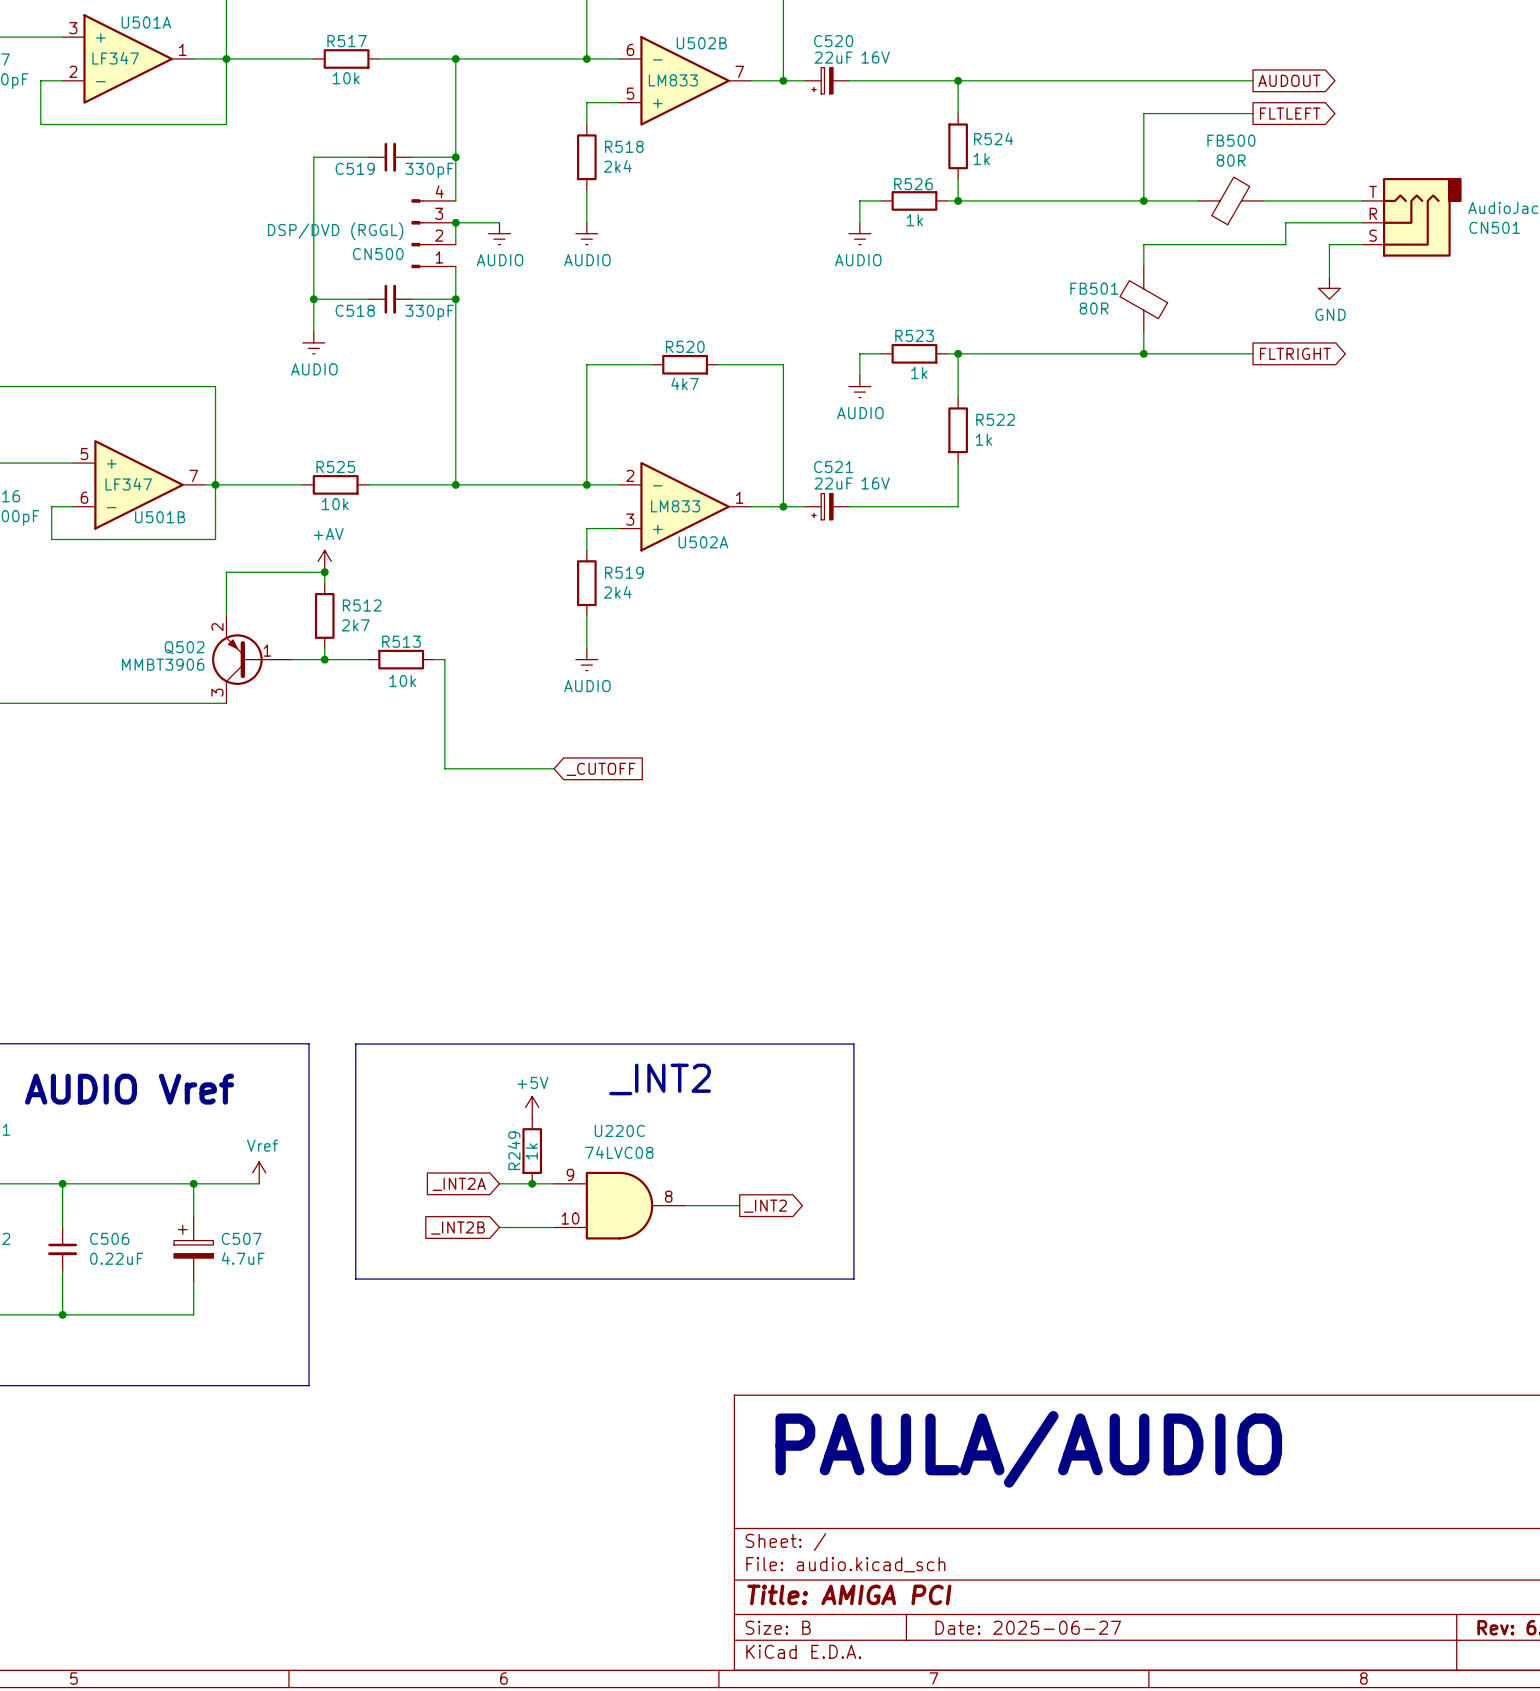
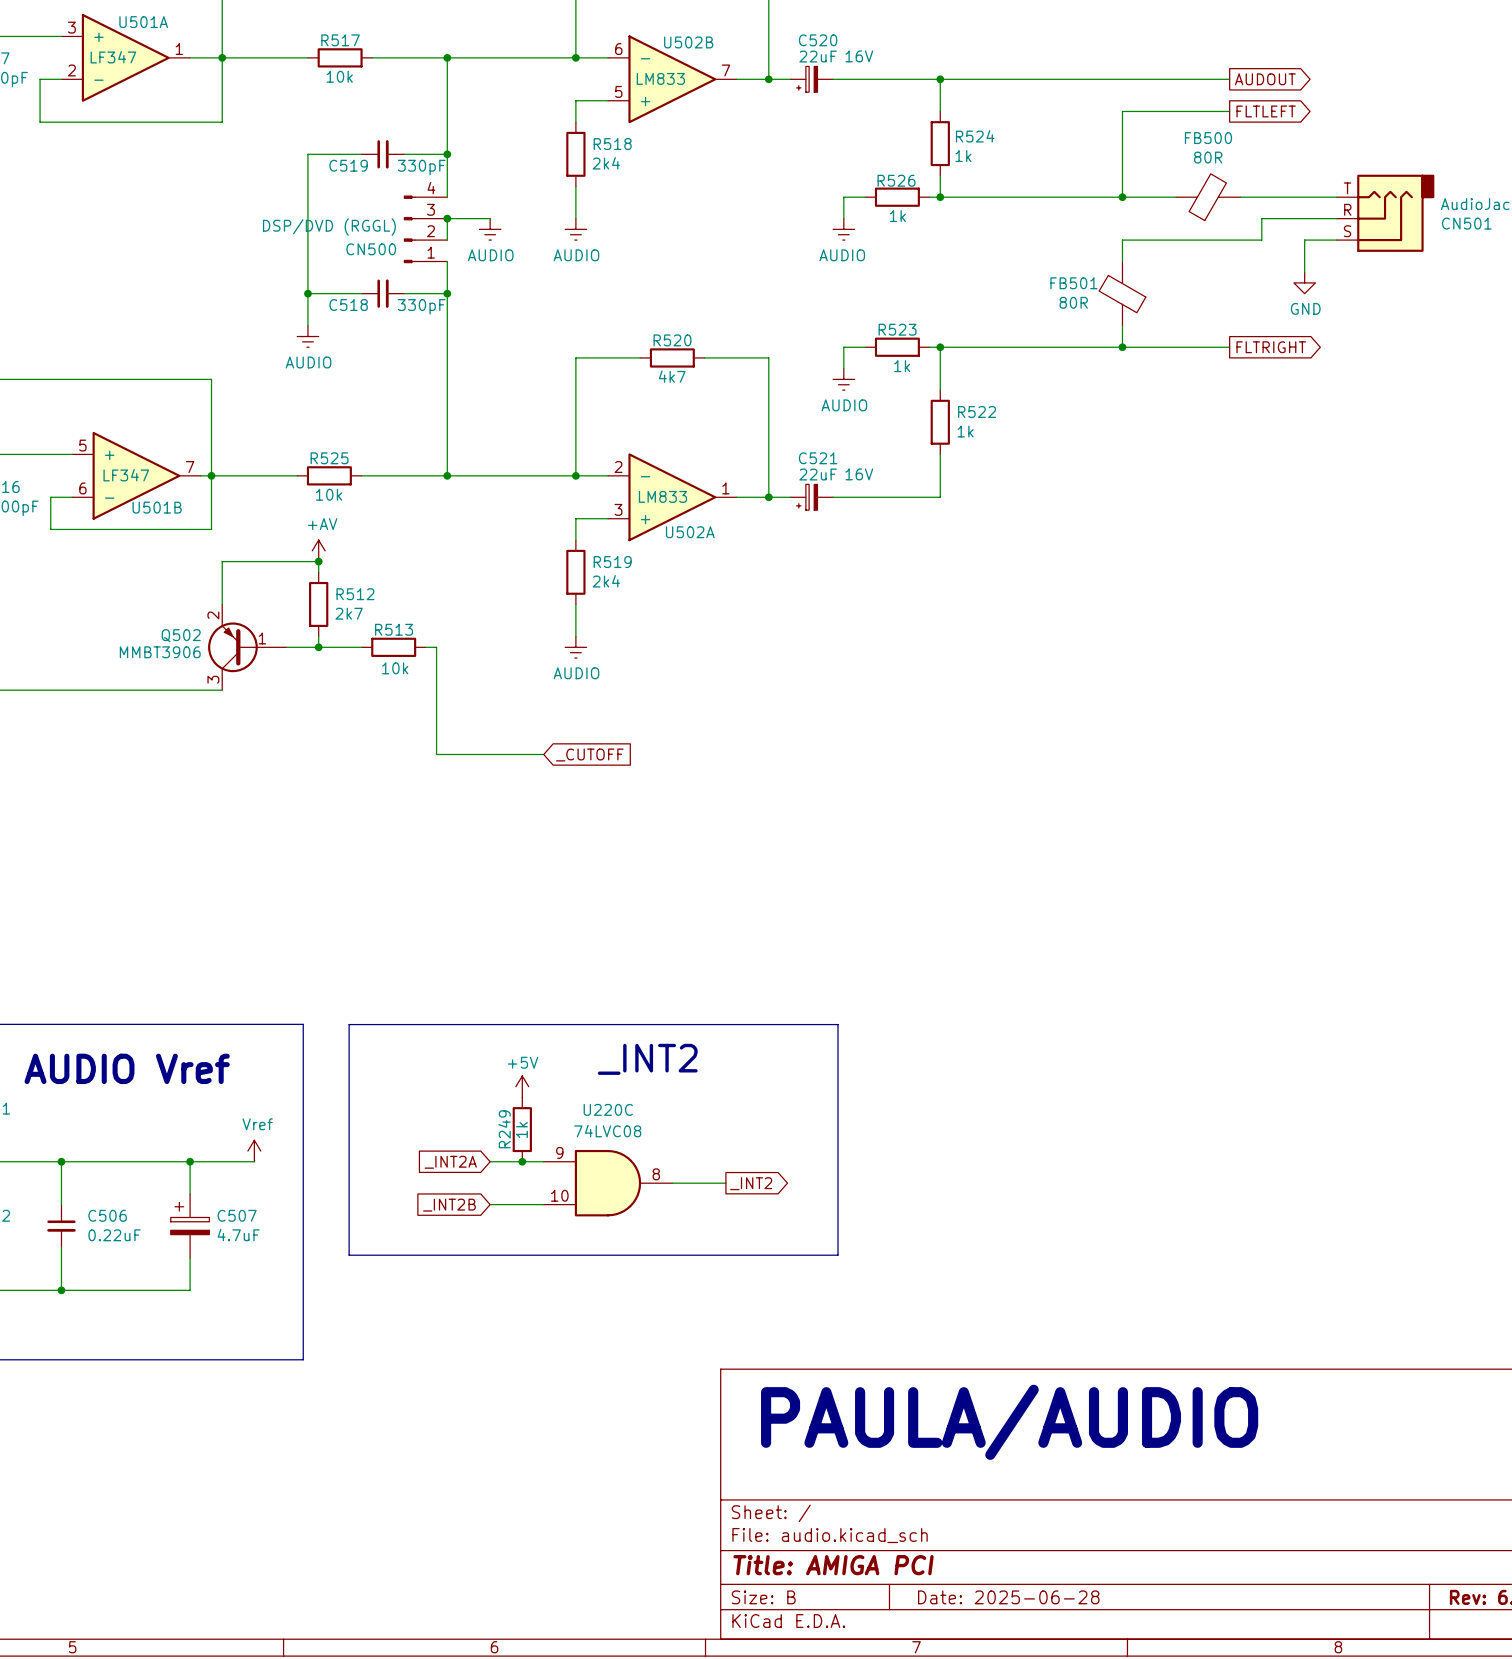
title block: Date: 2025-06-27 (1028, 1627) -> Date: 2025-06-28 (1008, 1597)

